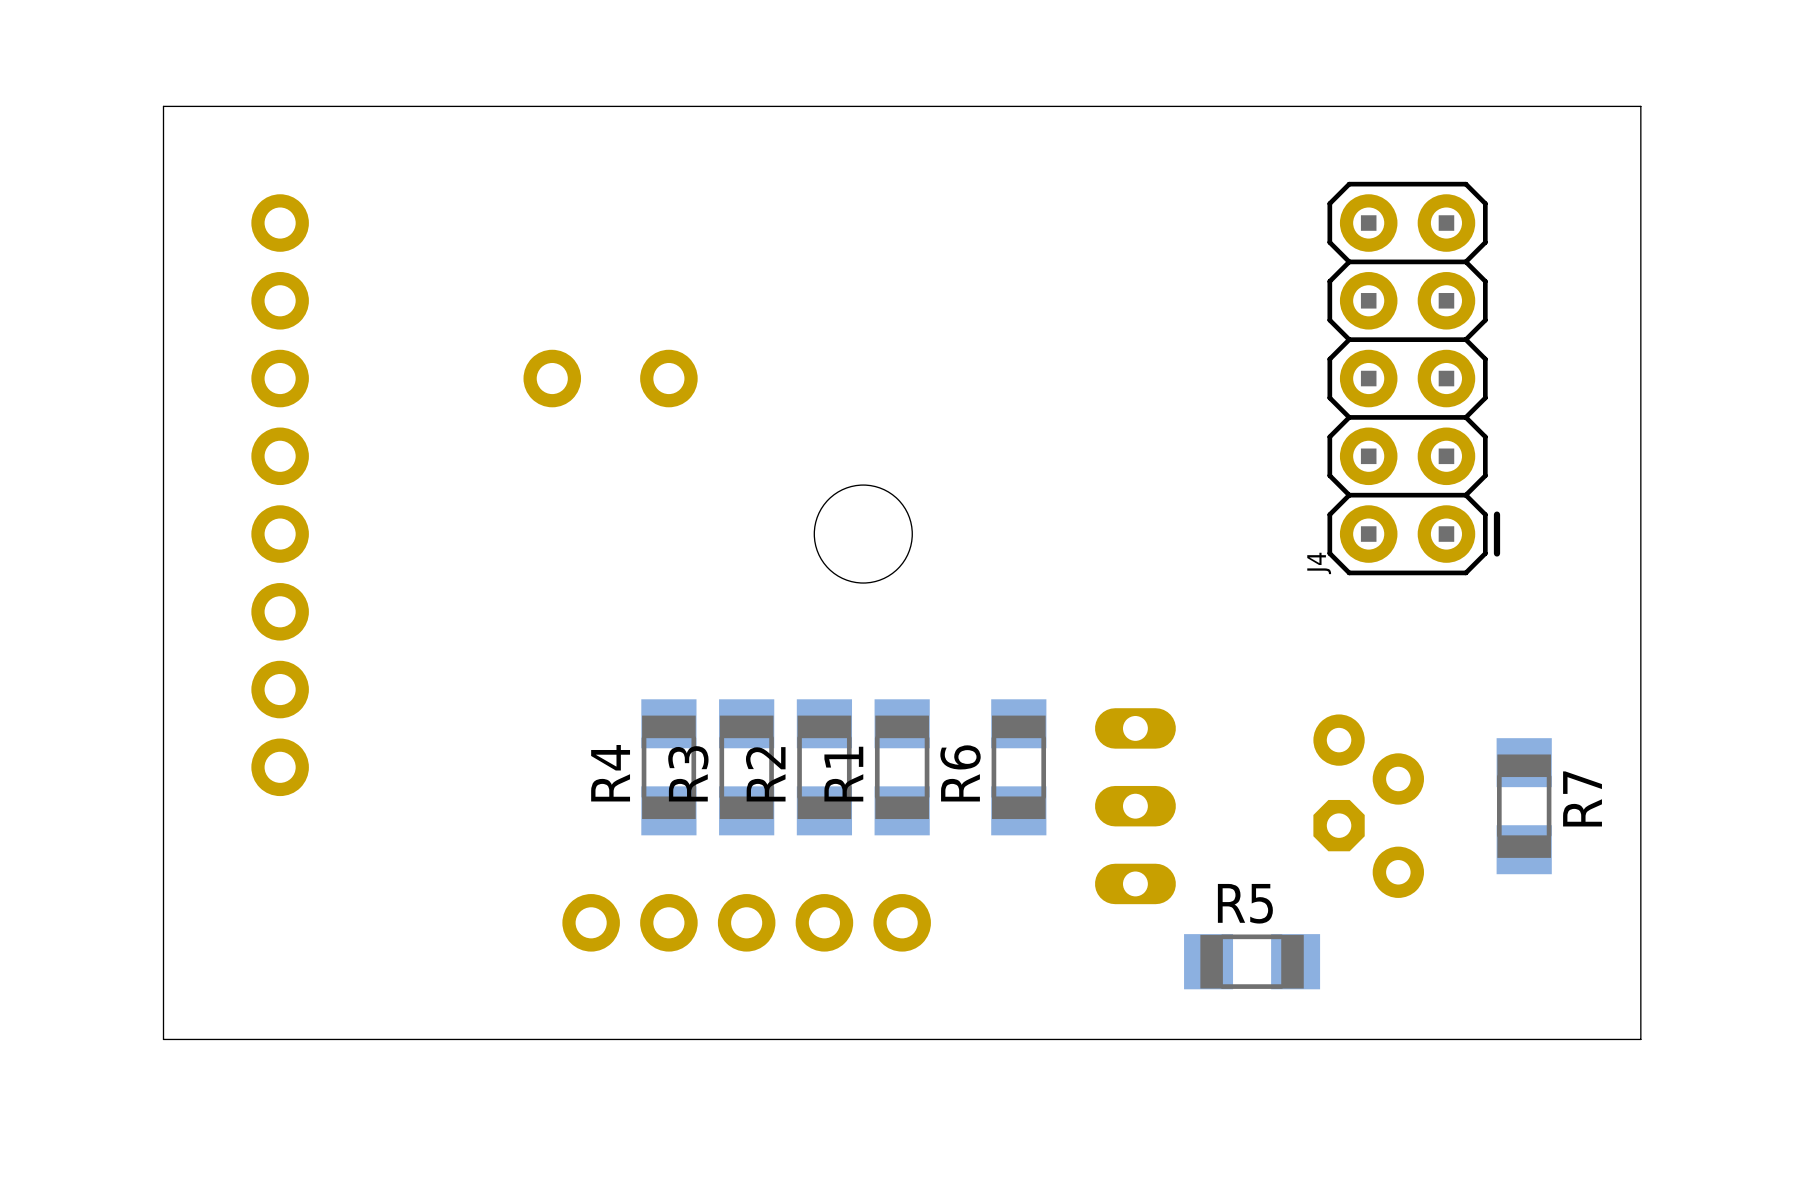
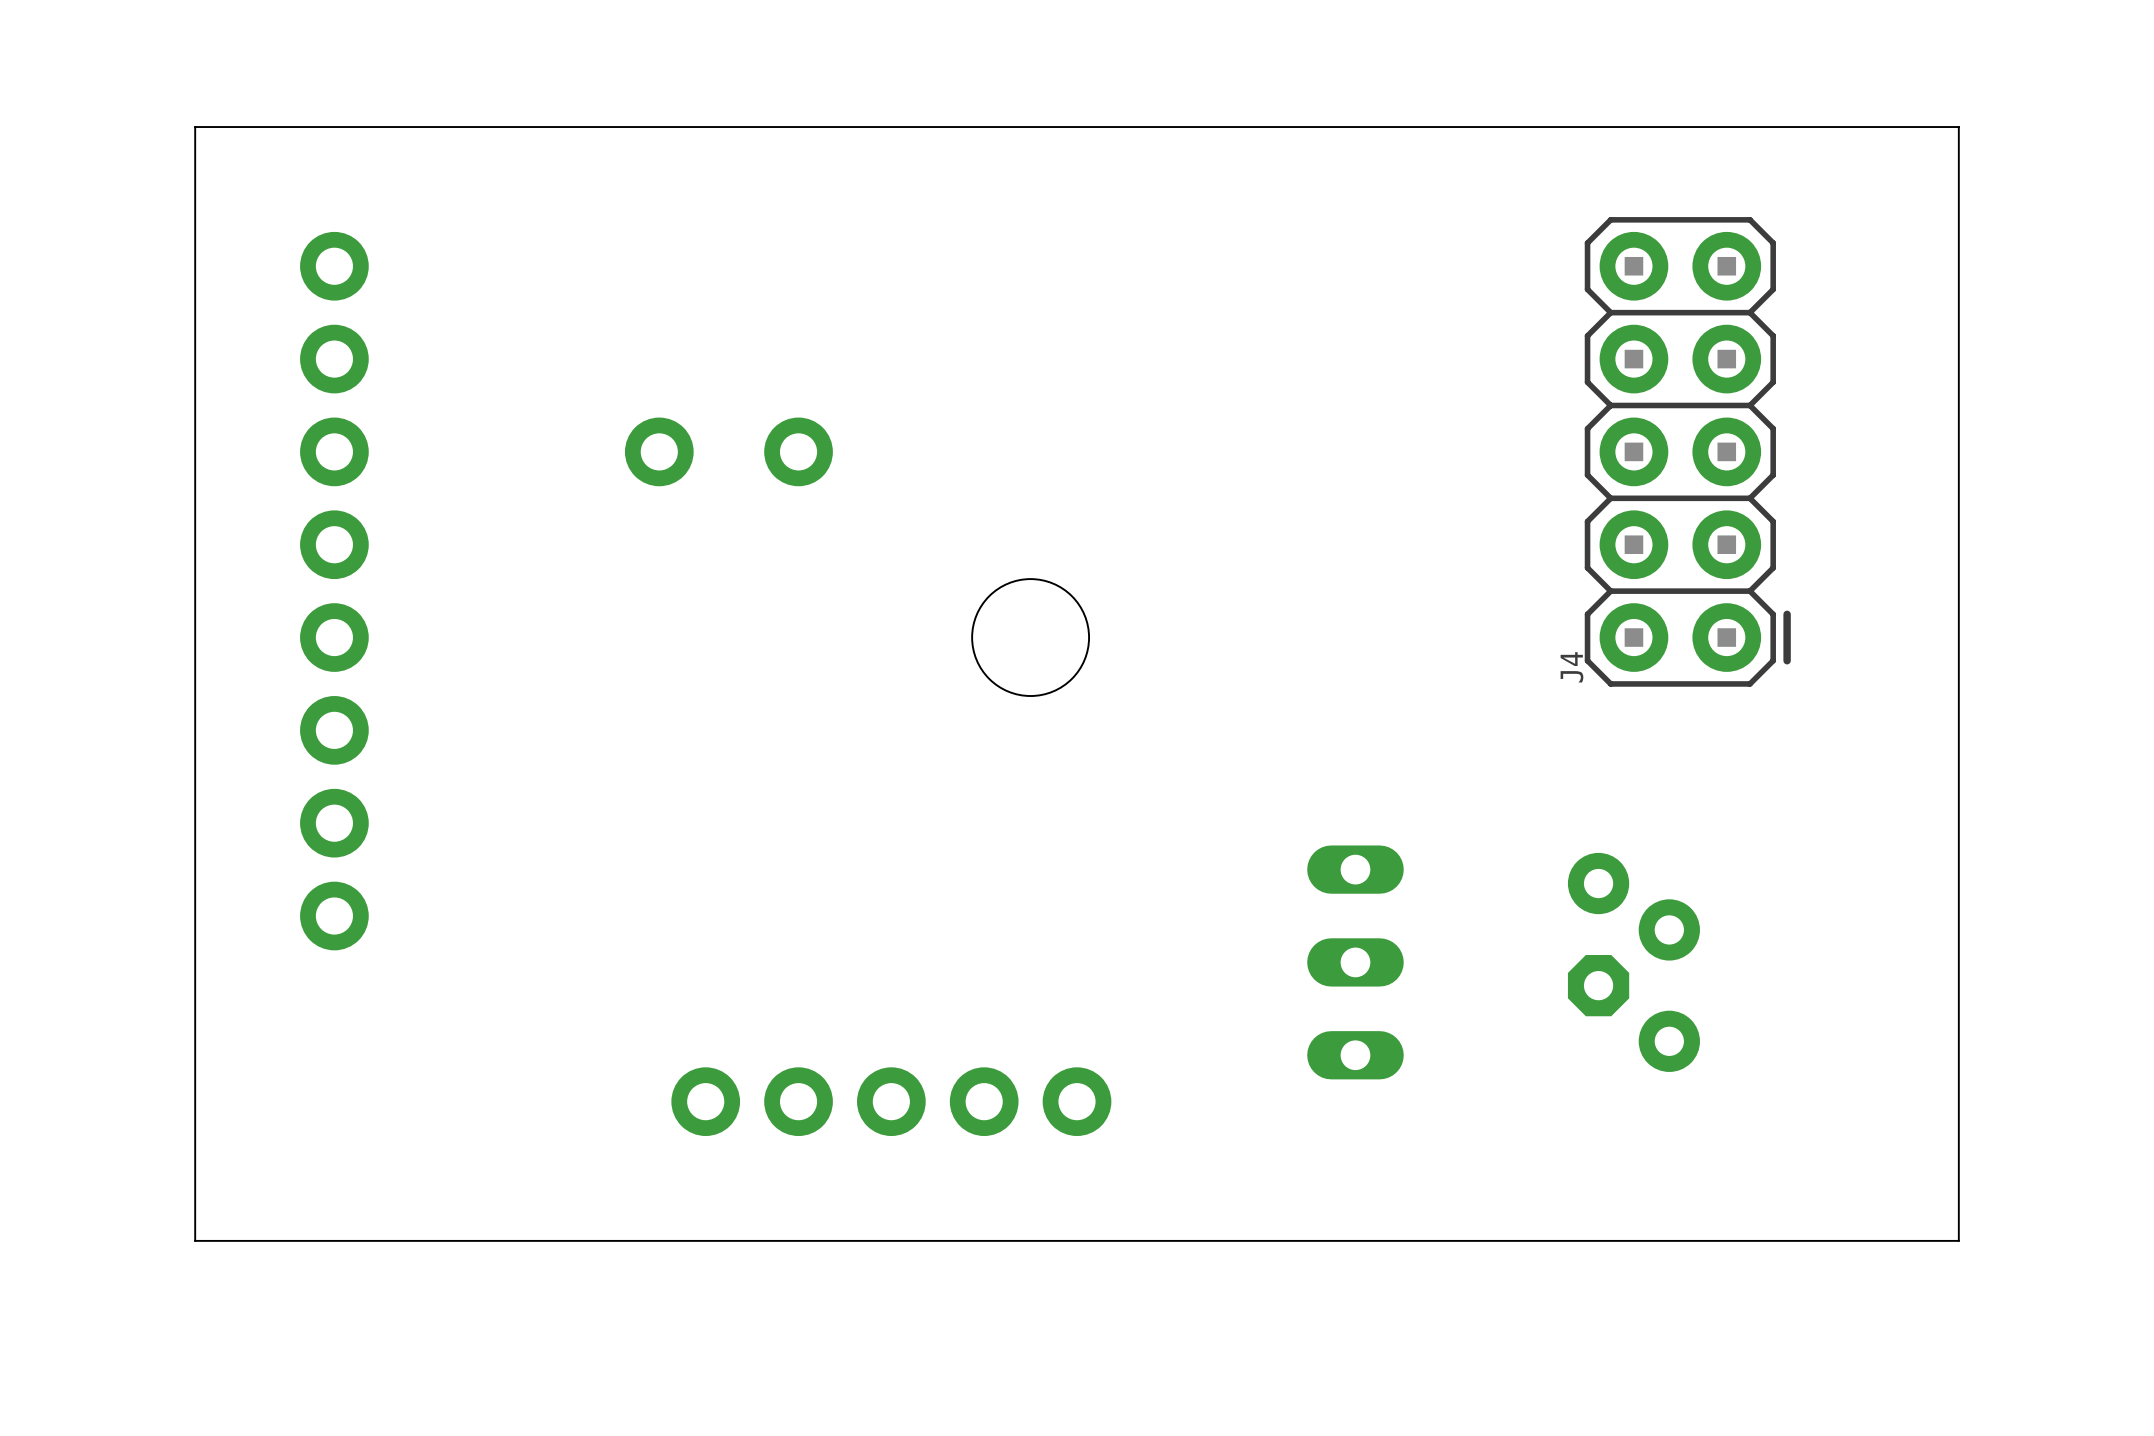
R4: (668, 767) -> none
R3: (746, 767) -> none
R2: (824, 767) -> none
R1: (902, 767) -> none
R6: (1018, 767) -> none
R7: (1524, 806) -> none
R5: (1252, 961) -> none

